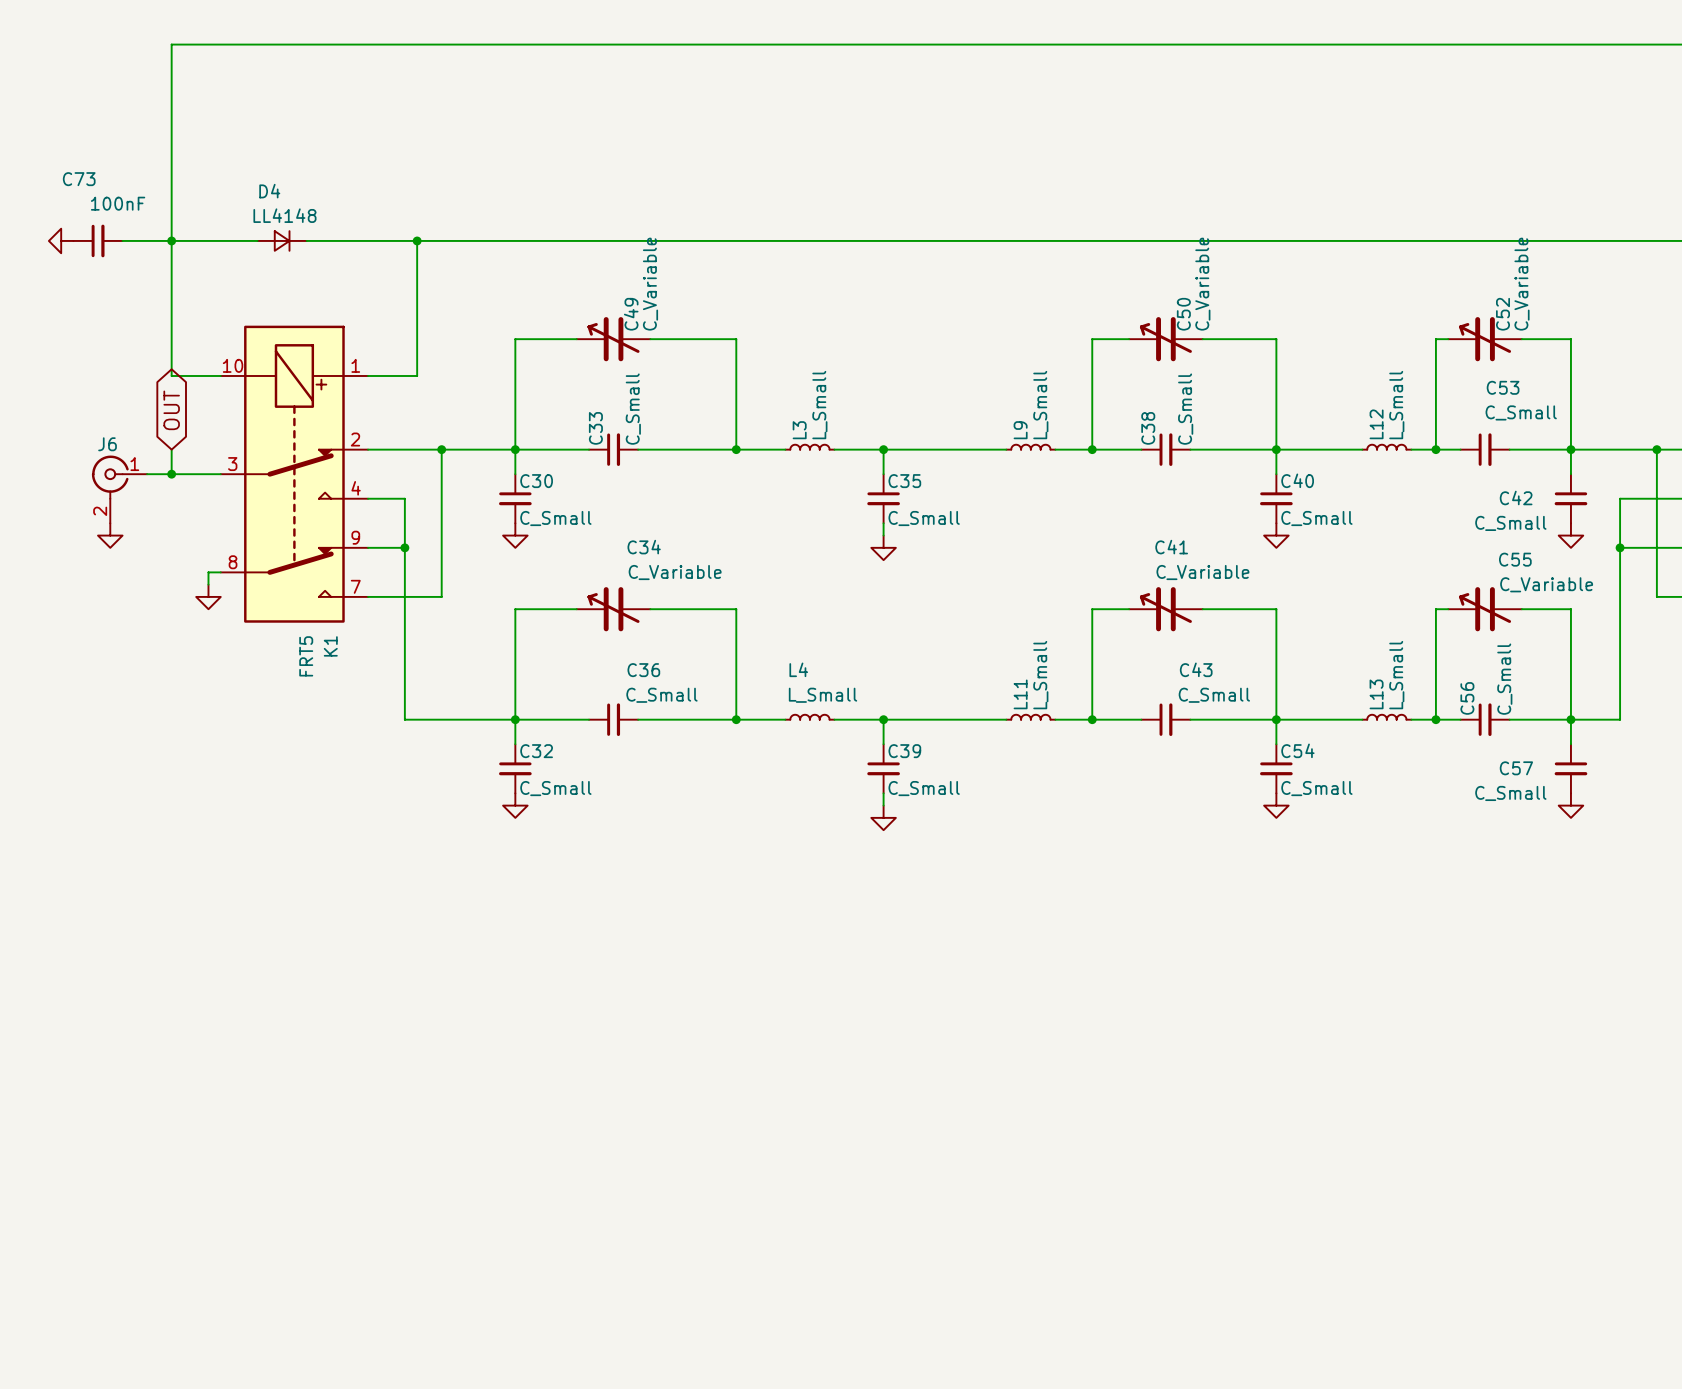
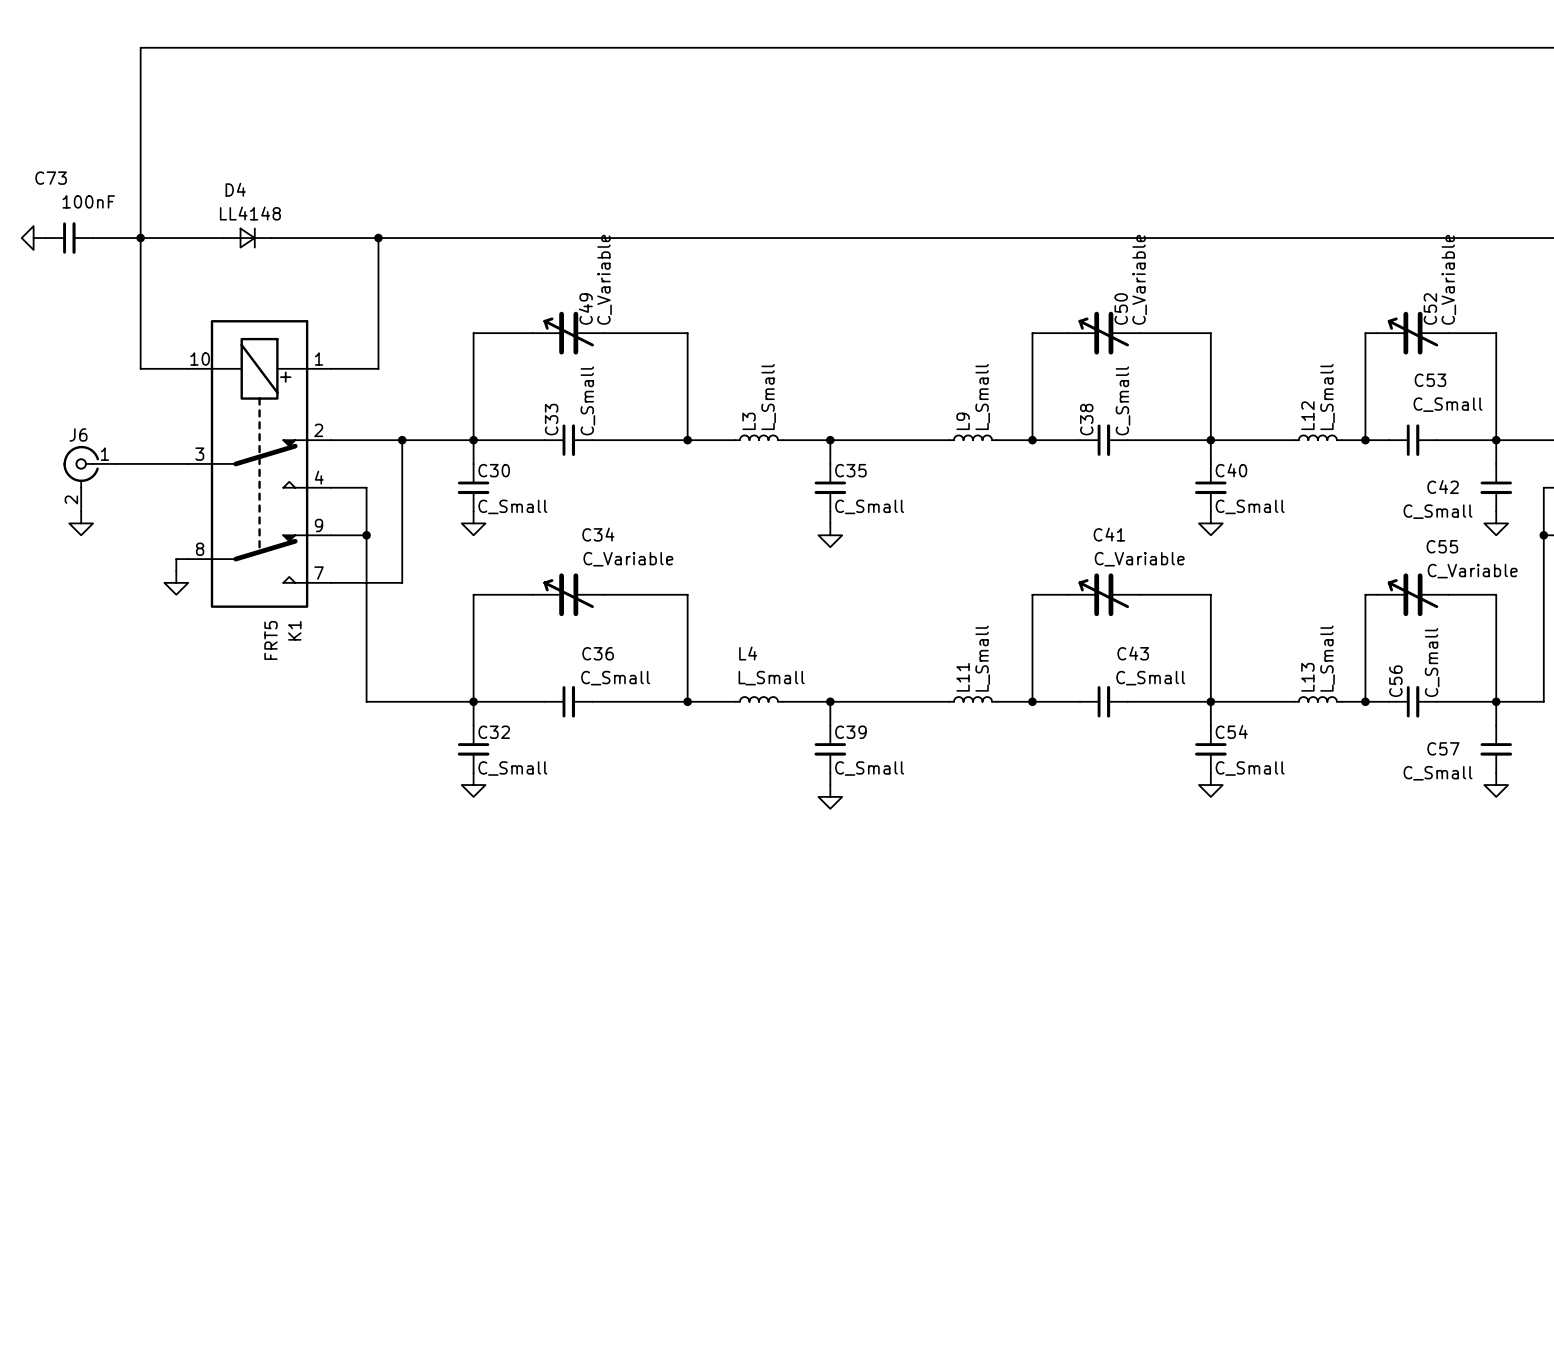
global label: OUT (171, 410) -> none
wire: (171, 449) (171, 474) -> none
junction: (171, 474) -> none

